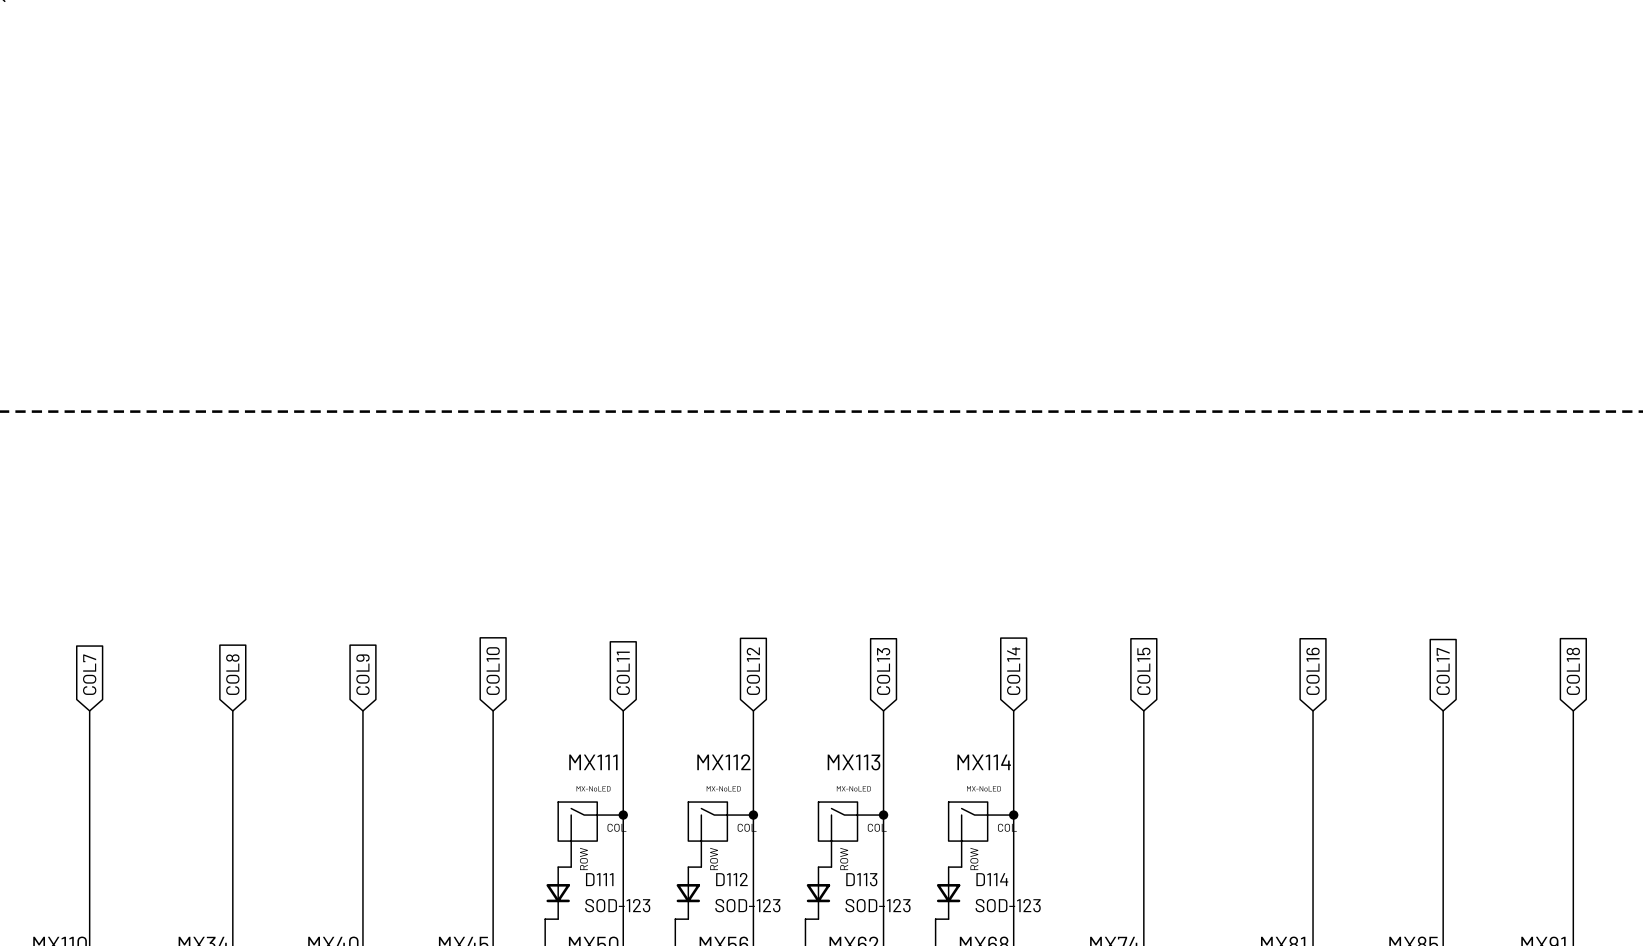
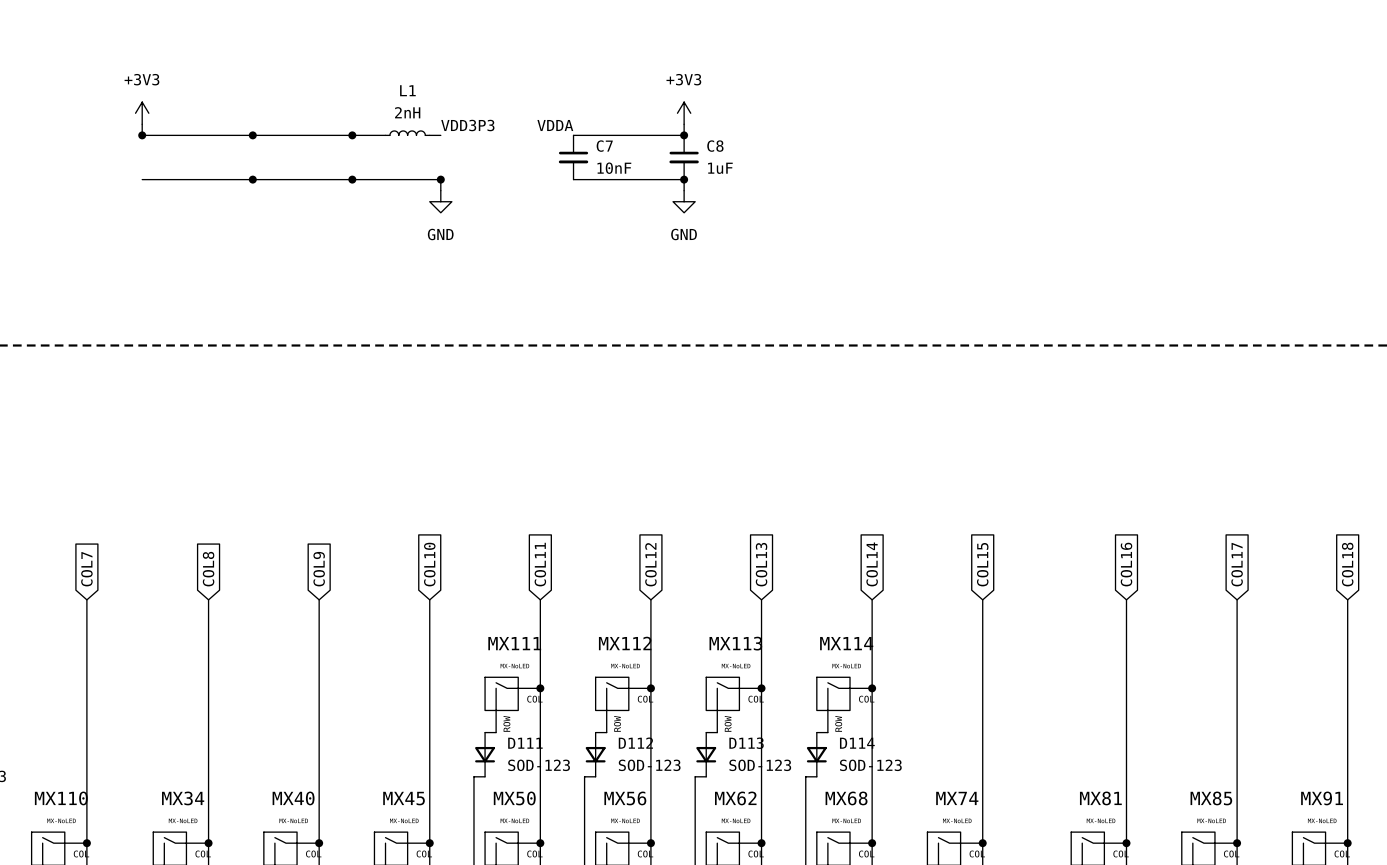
power symbol: none -> +3V3 (142, 113)
power symbol: none -> +3V3 (684, 113)
wire: none -> (142, 124) (142, 135) (385, 135)
wire: none -> (684, 124) (684, 135) (573, 135)
label: none -> VDD3P3 (467, 125)
label: none -> VDDA (555, 125)
L1: none -> 2nH (407, 133)
junction: none -> (142, 135)
junction: none -> (252, 135)
junction: none -> (352, 135)
wire: none -> (429, 135) (440, 135)
junction: none -> (684, 135)
C7: none -> 10nF (573, 157)
C8: none -> 1uF (684, 157)
wire: none -> (142, 179) (440, 179) (440, 190)
junction: none -> (252, 179)
junction: none -> (352, 179)
junction: none -> (440, 179)
wire: none -> (573, 179) (684, 179) (684, 190)
junction: none -> (684, 179)
power symbol: none -> GND (440, 201)
power symbol: none -> GND (684, 201)

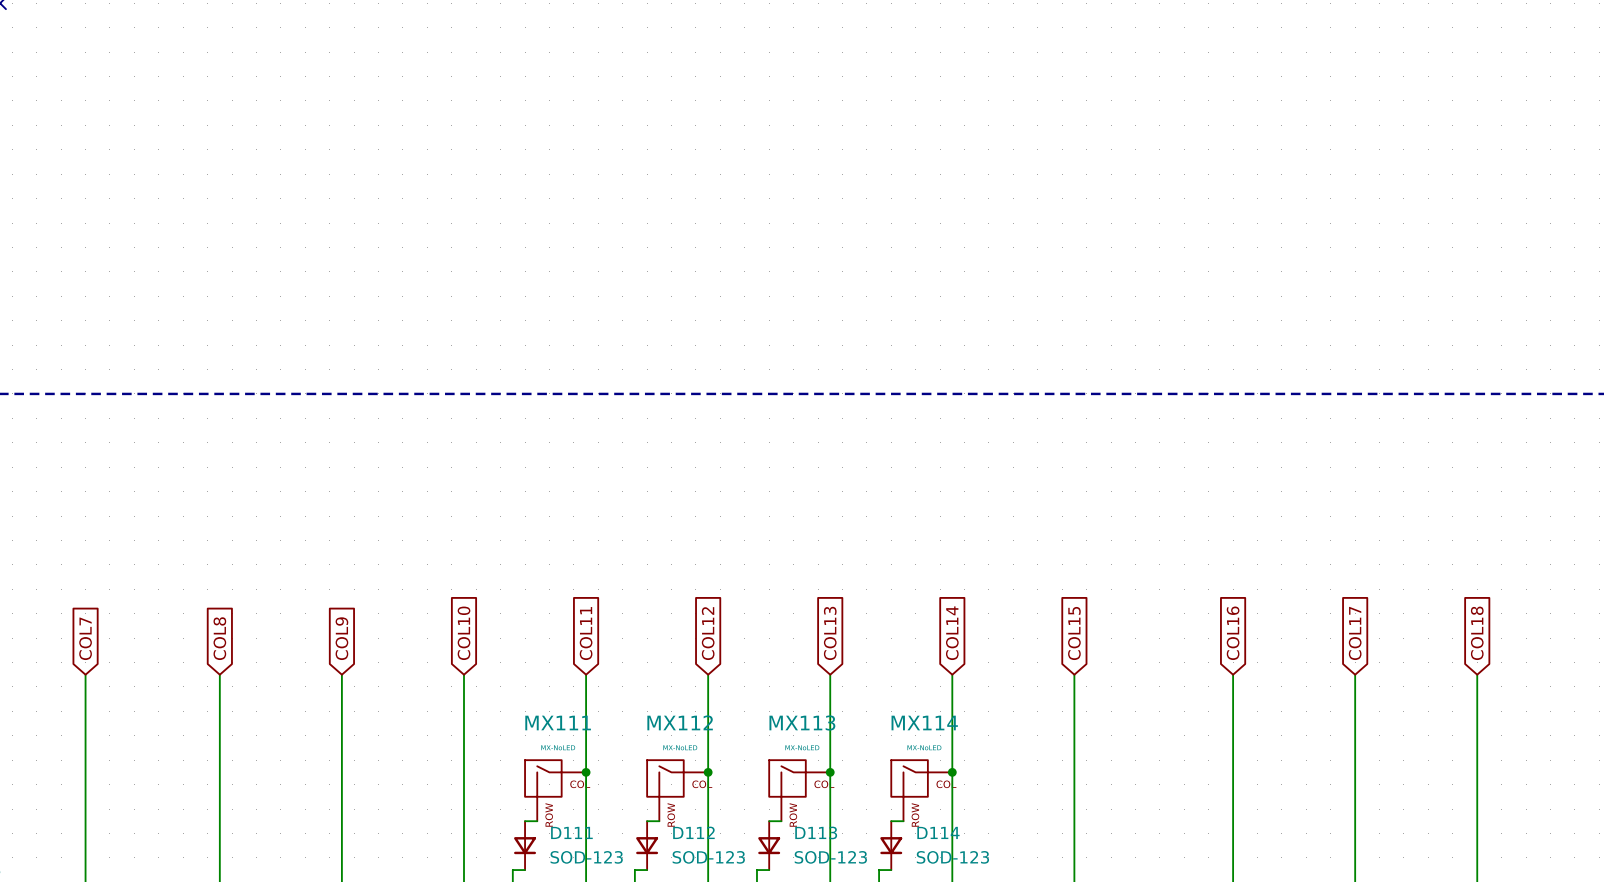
power symbol: +3V3 (142, 113) -> none
power symbol: +3V3 (684, 113) -> none
wire: (142, 124) (142, 135) (385, 135) -> none
wire: (684, 124) (684, 135) (573, 135) -> none
label: VDD3P3 (467, 125) -> none
label: VDDA (555, 125) -> none
L1: 2nH (407, 133) -> none
junction: (142, 135) -> none
junction: (252, 135) -> none
junction: (352, 135) -> none
wire: (429, 135) (440, 135) -> none
junction: (684, 135) -> none
C7: 10nF (573, 157) -> none
C8: 1uF (684, 157) -> none
wire: (142, 179) (440, 179) (440, 190) -> none
junction: (252, 179) -> none
junction: (352, 179) -> none
junction: (440, 179) -> none
wire: (573, 179) (684, 179) (684, 190) -> none
junction: (684, 179) -> none
power symbol: GND (440, 201) -> none
power symbol: GND (684, 201) -> none

